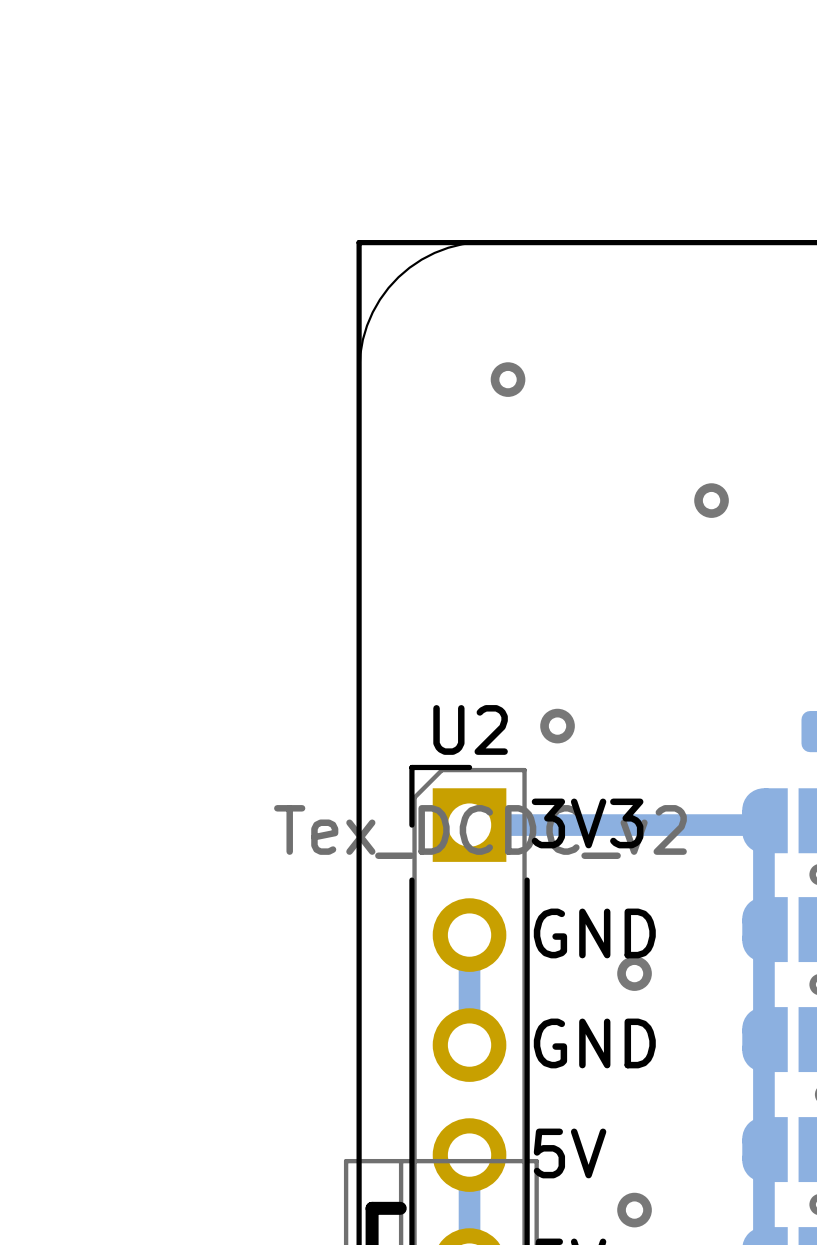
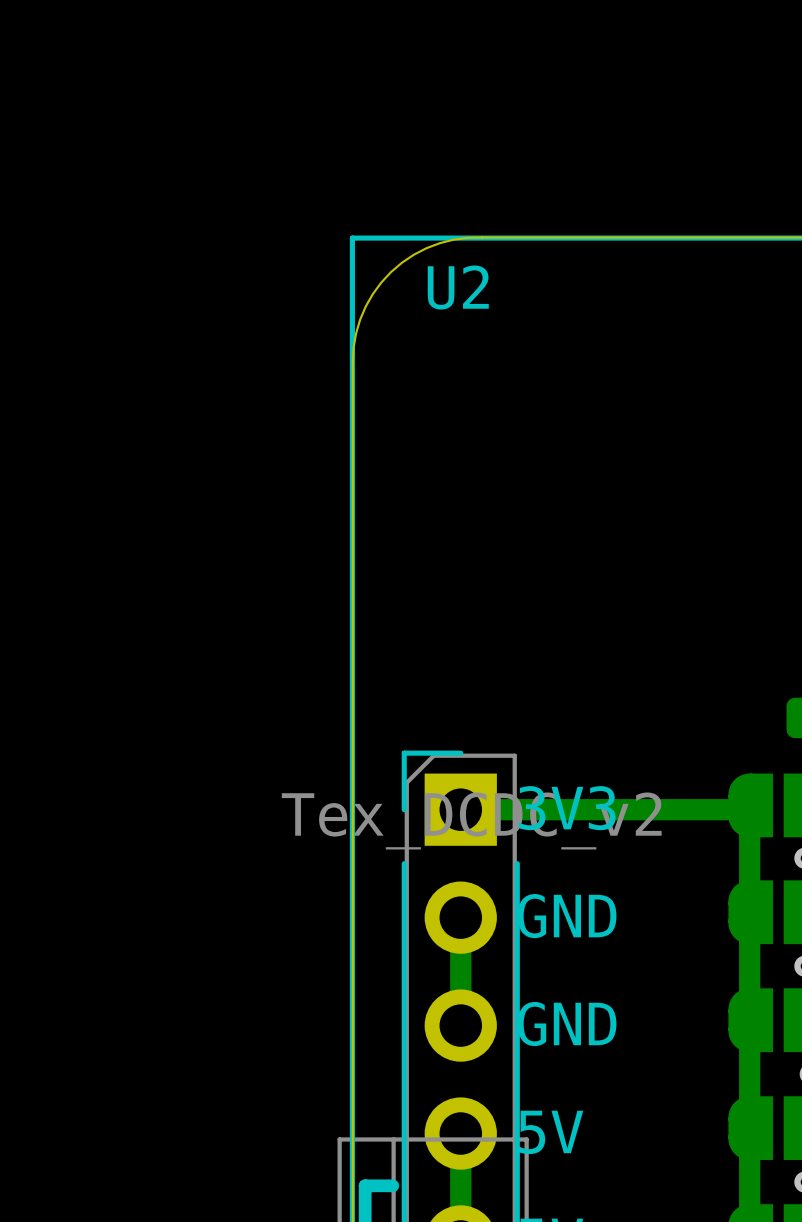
via: (508, 379) -> none
via: (711, 500) -> none
via: (557, 726) -> none
U2 name position: U2 (470, 729) -> U2 (458, 287)
via: (634, 973) -> none
via: (634, 1210) -> none

